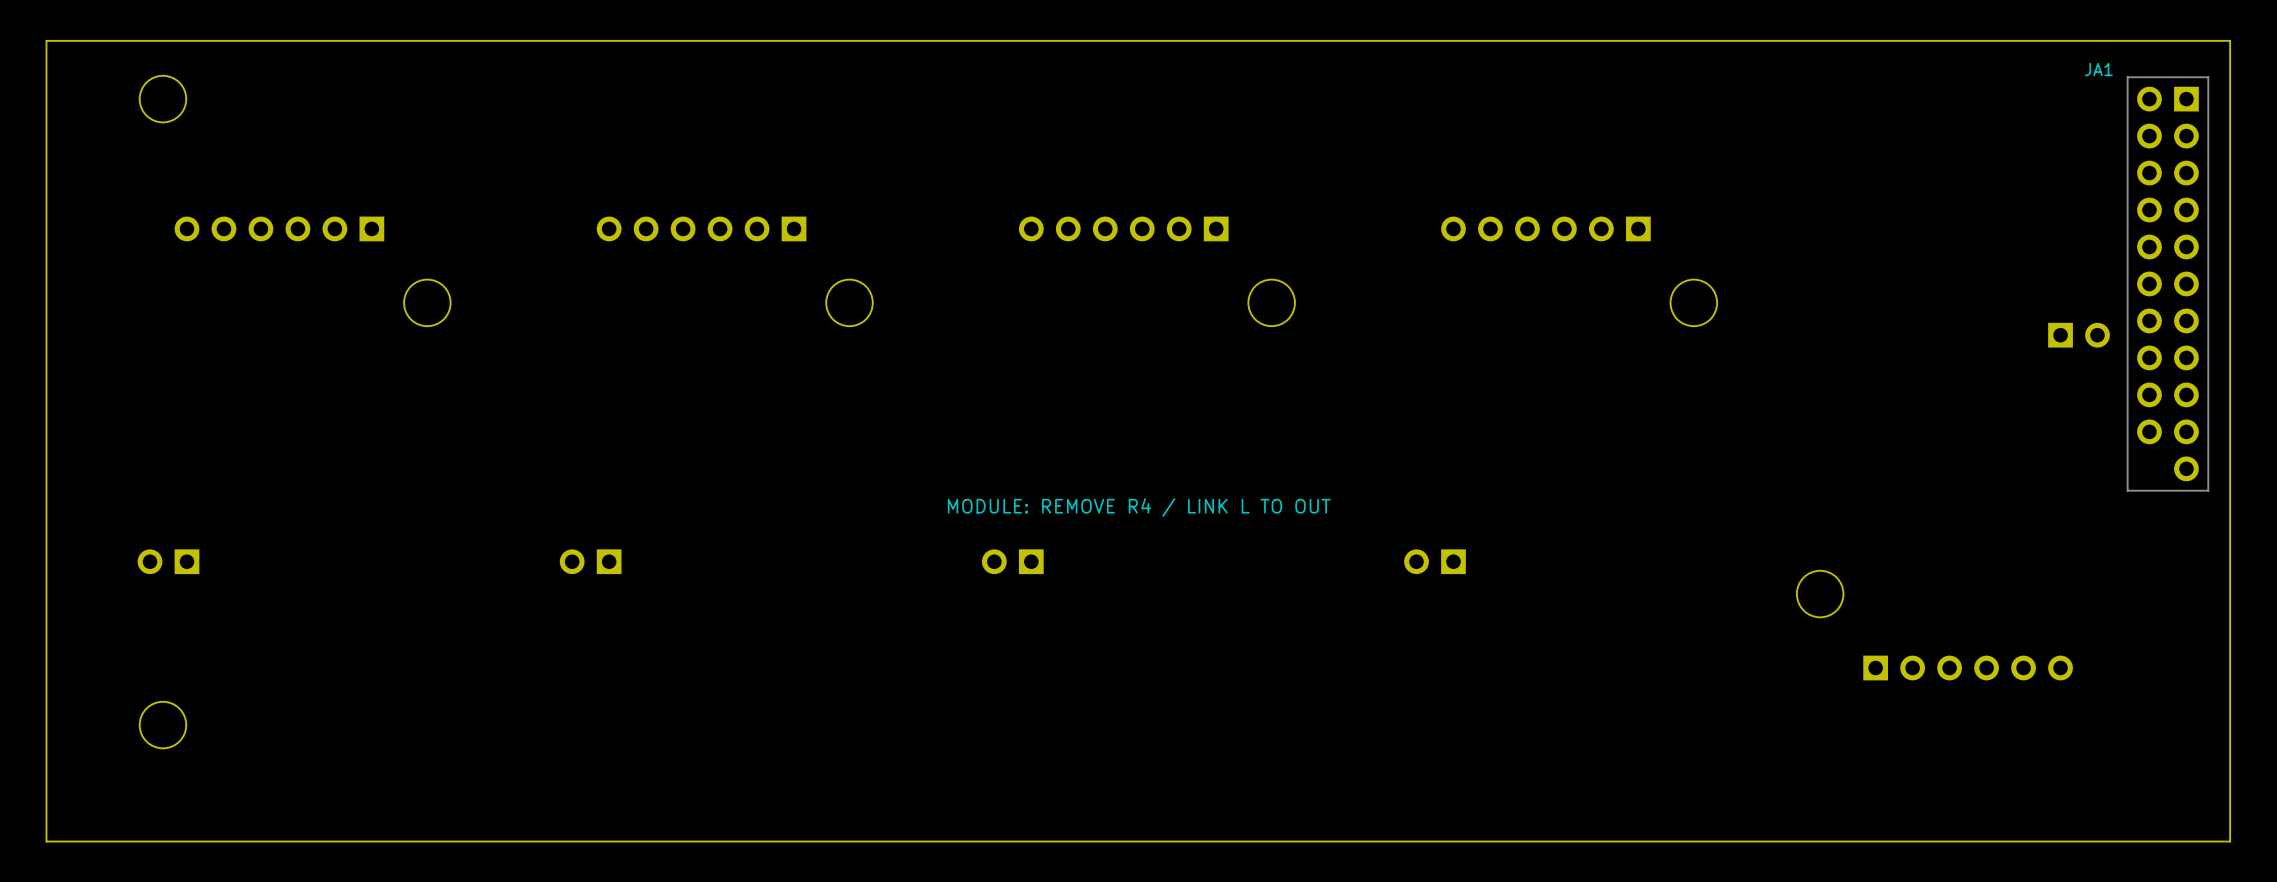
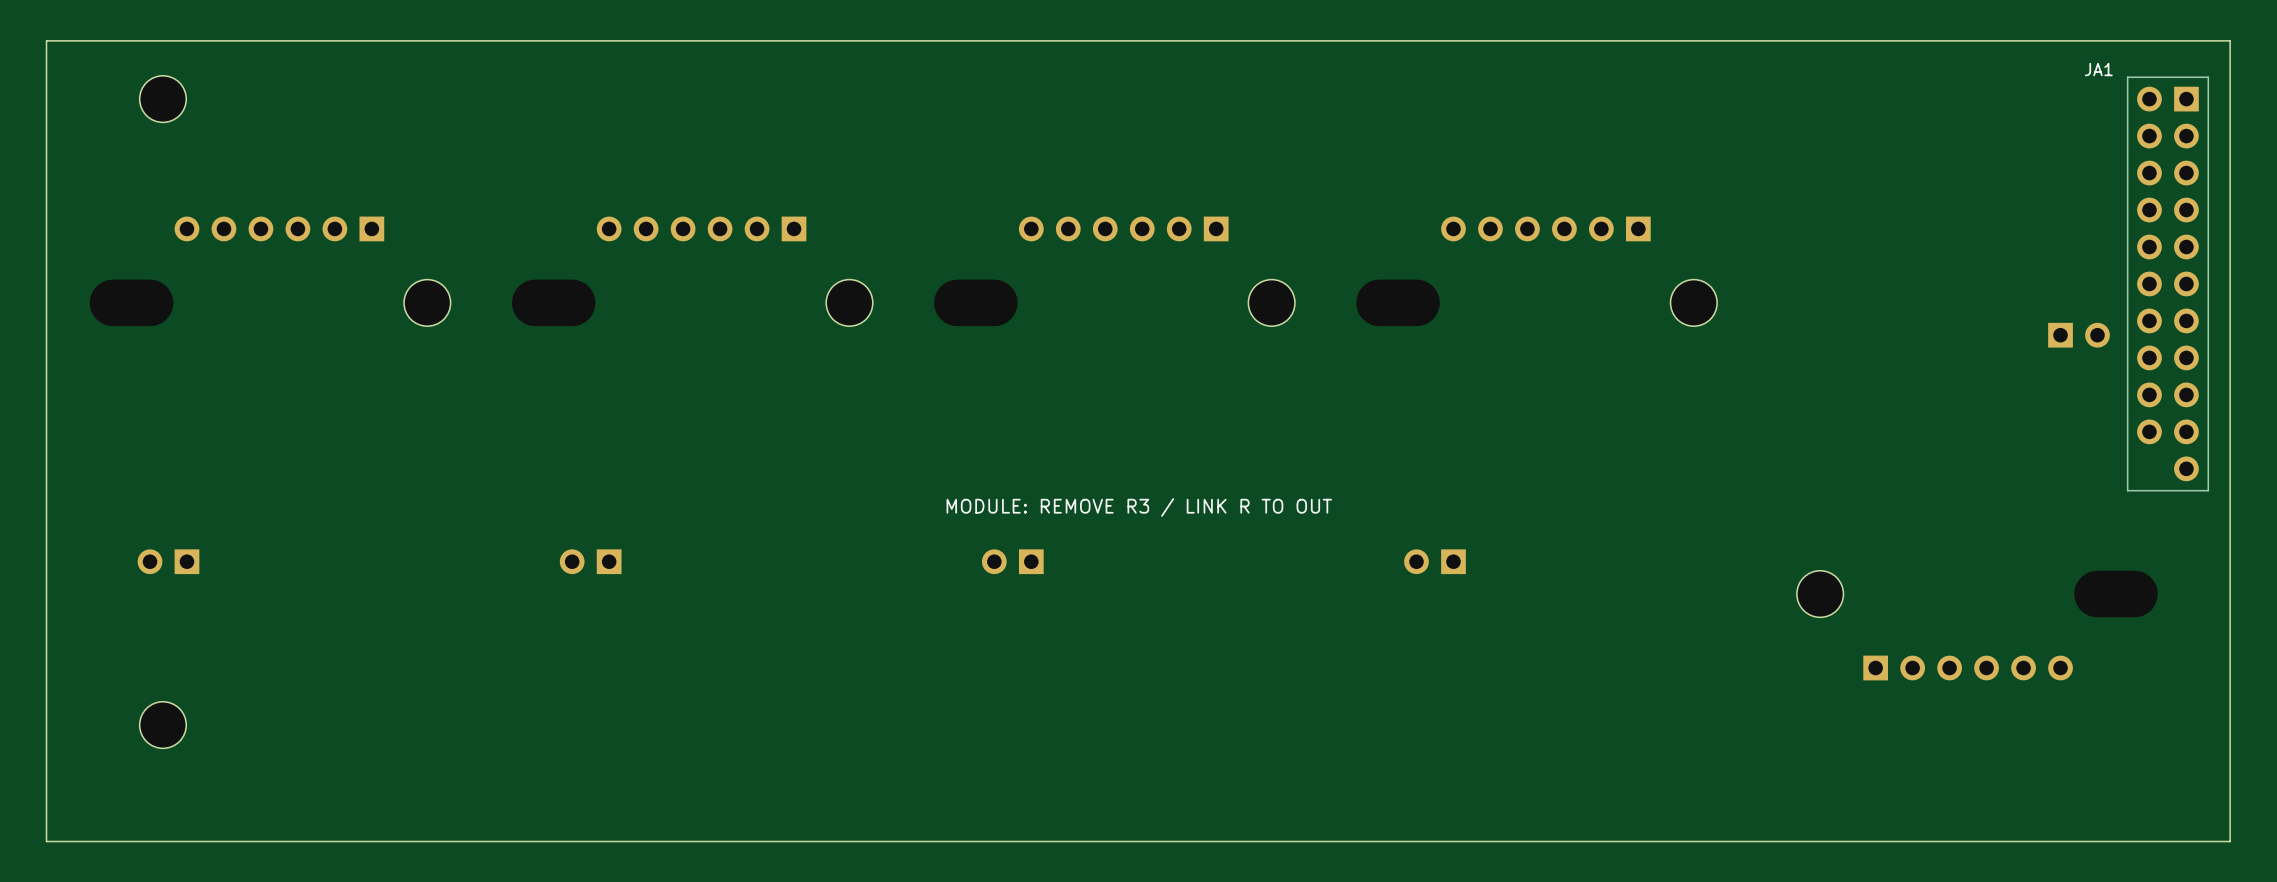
text: MODULE: REMOVE R4 / LINK L TO OUT (1139, 507) -> MODULE: REMOVE R3 / LINK R TO OUT (1139, 507)

